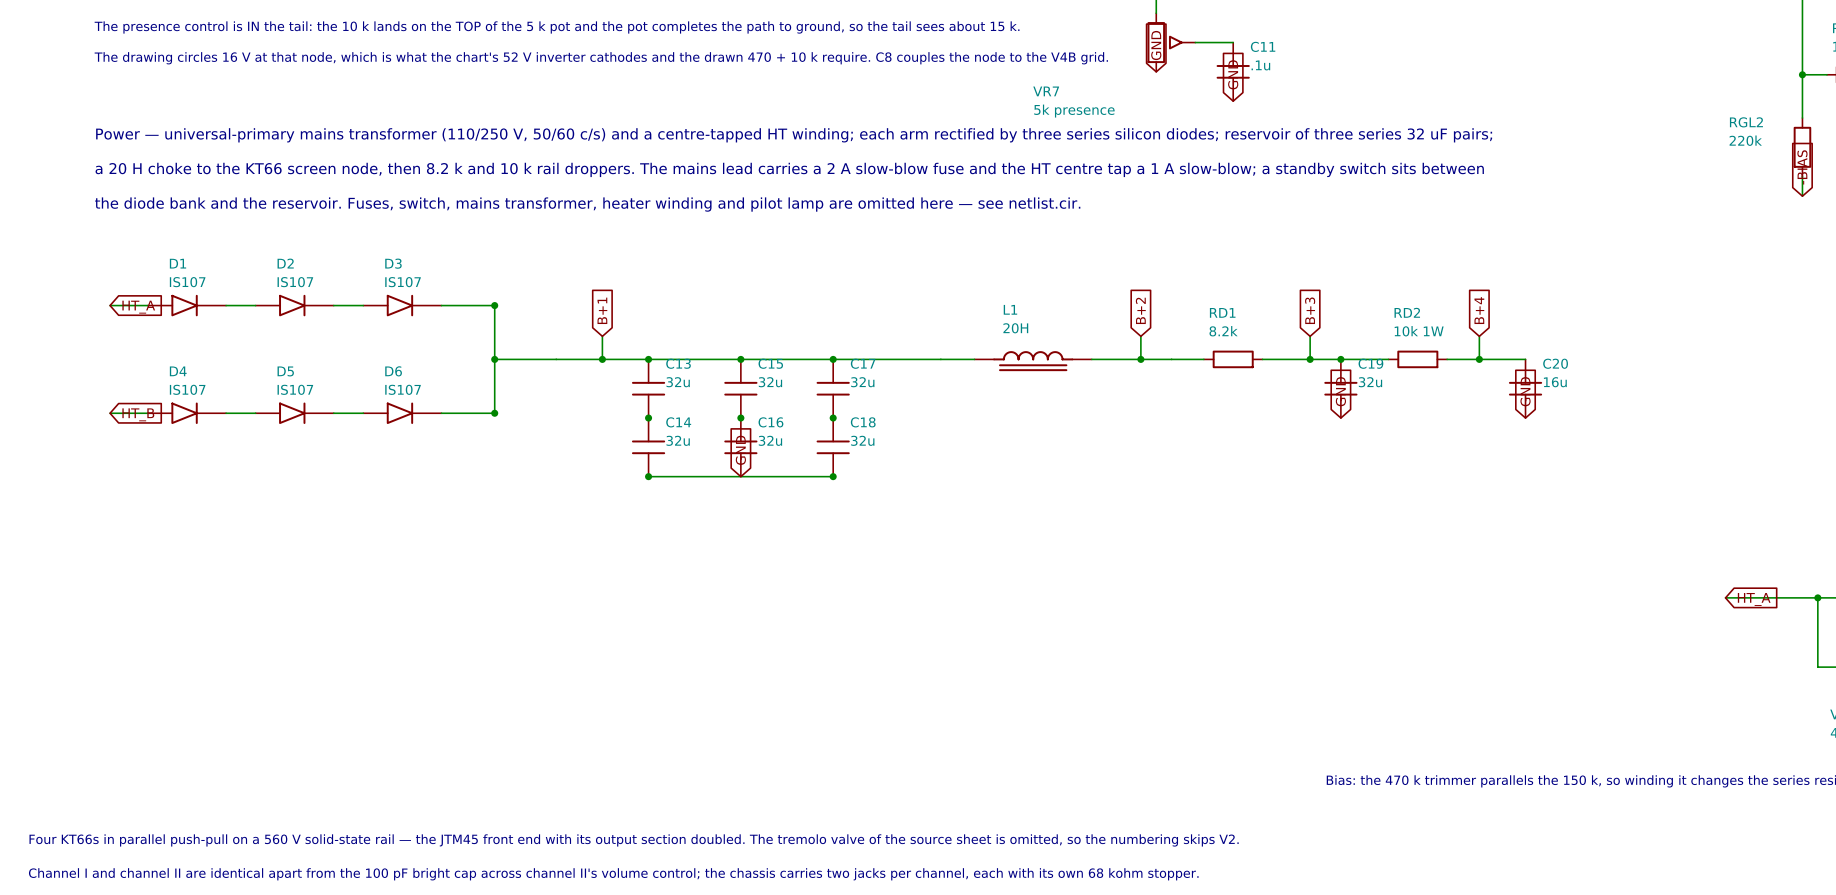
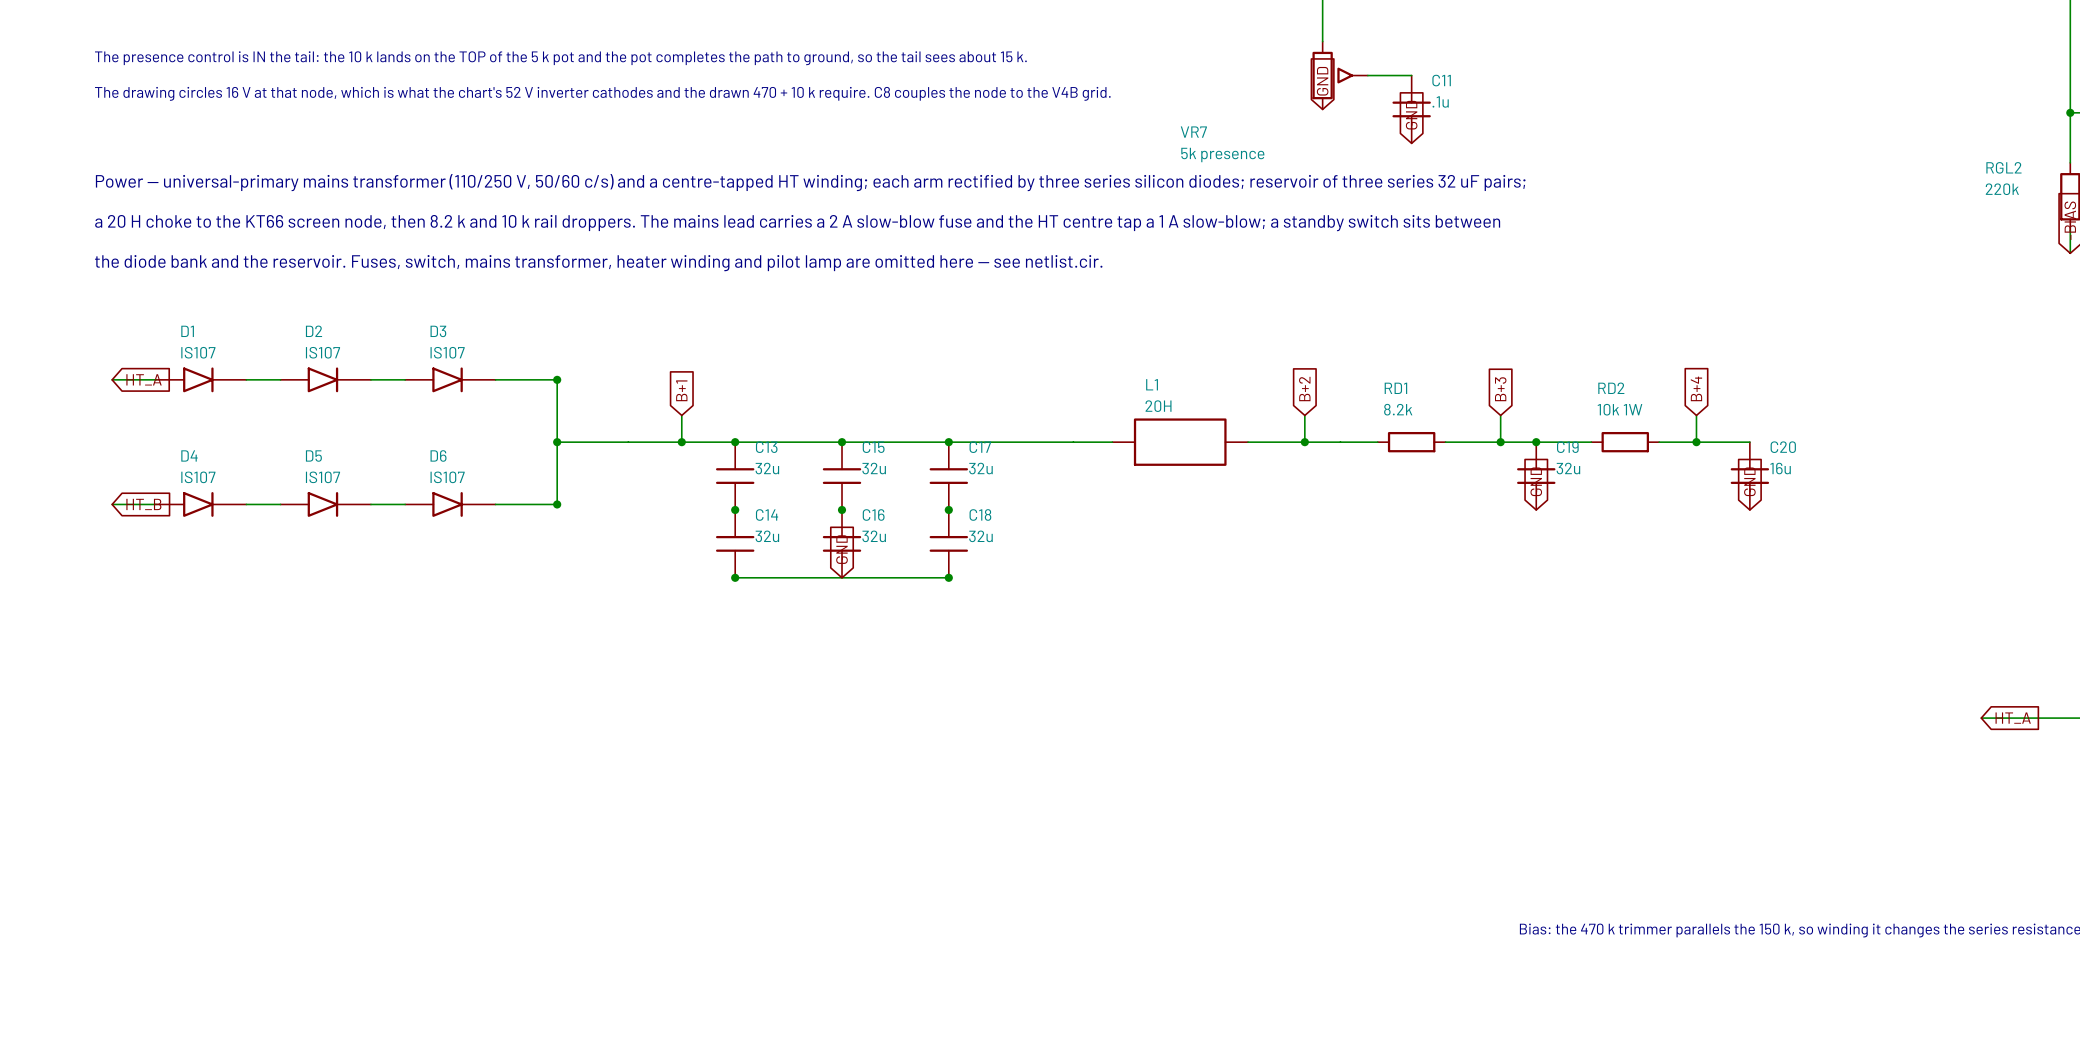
L1 symbol: [974, 351, 1092, 372] -> [1112, 418, 1249, 466]
text: Four KT66s in parallel push-pull on a 560 V solid-state rail — the JTM45 front end with its output section doubled. The tremolo valve of the source sheet is omitted, so the numbering skips V2. (634, 840) -> none
text: Channel I and channel II are identical apart from the 100 pF bright cap across channel II's volume control; the chassis carries two jacks per channel, each with its own 68 kohm stopper. (613, 874) -> none

